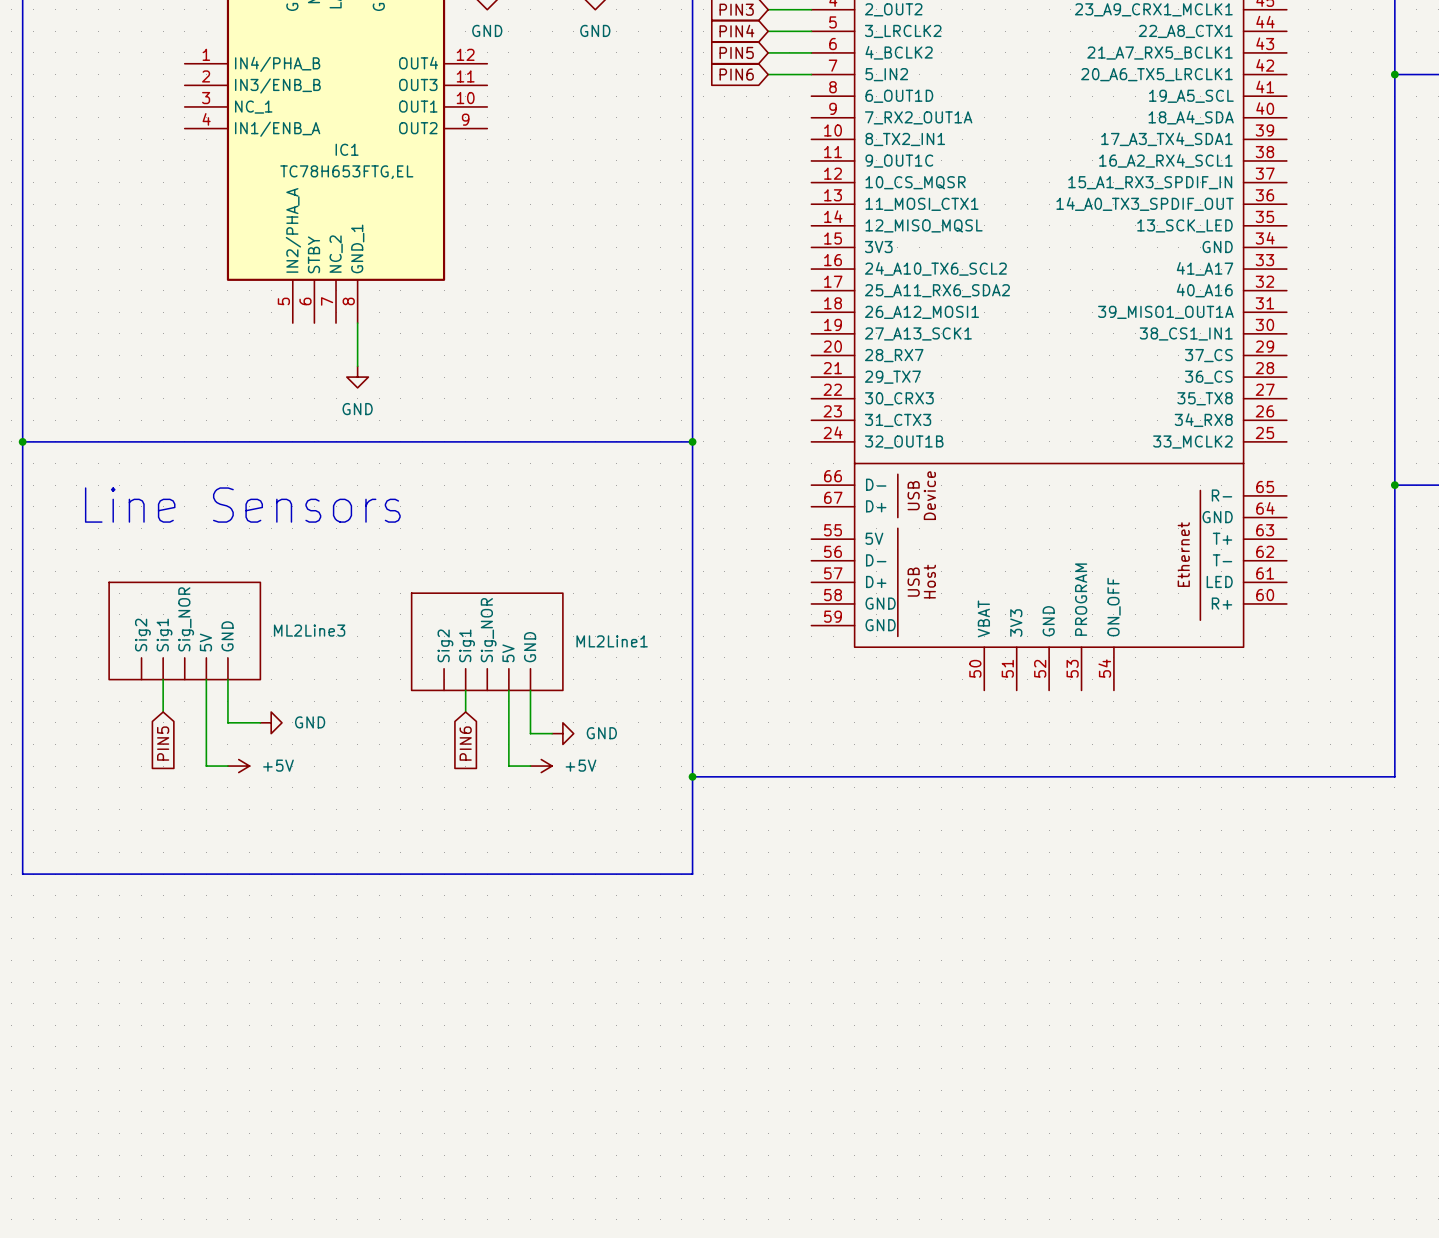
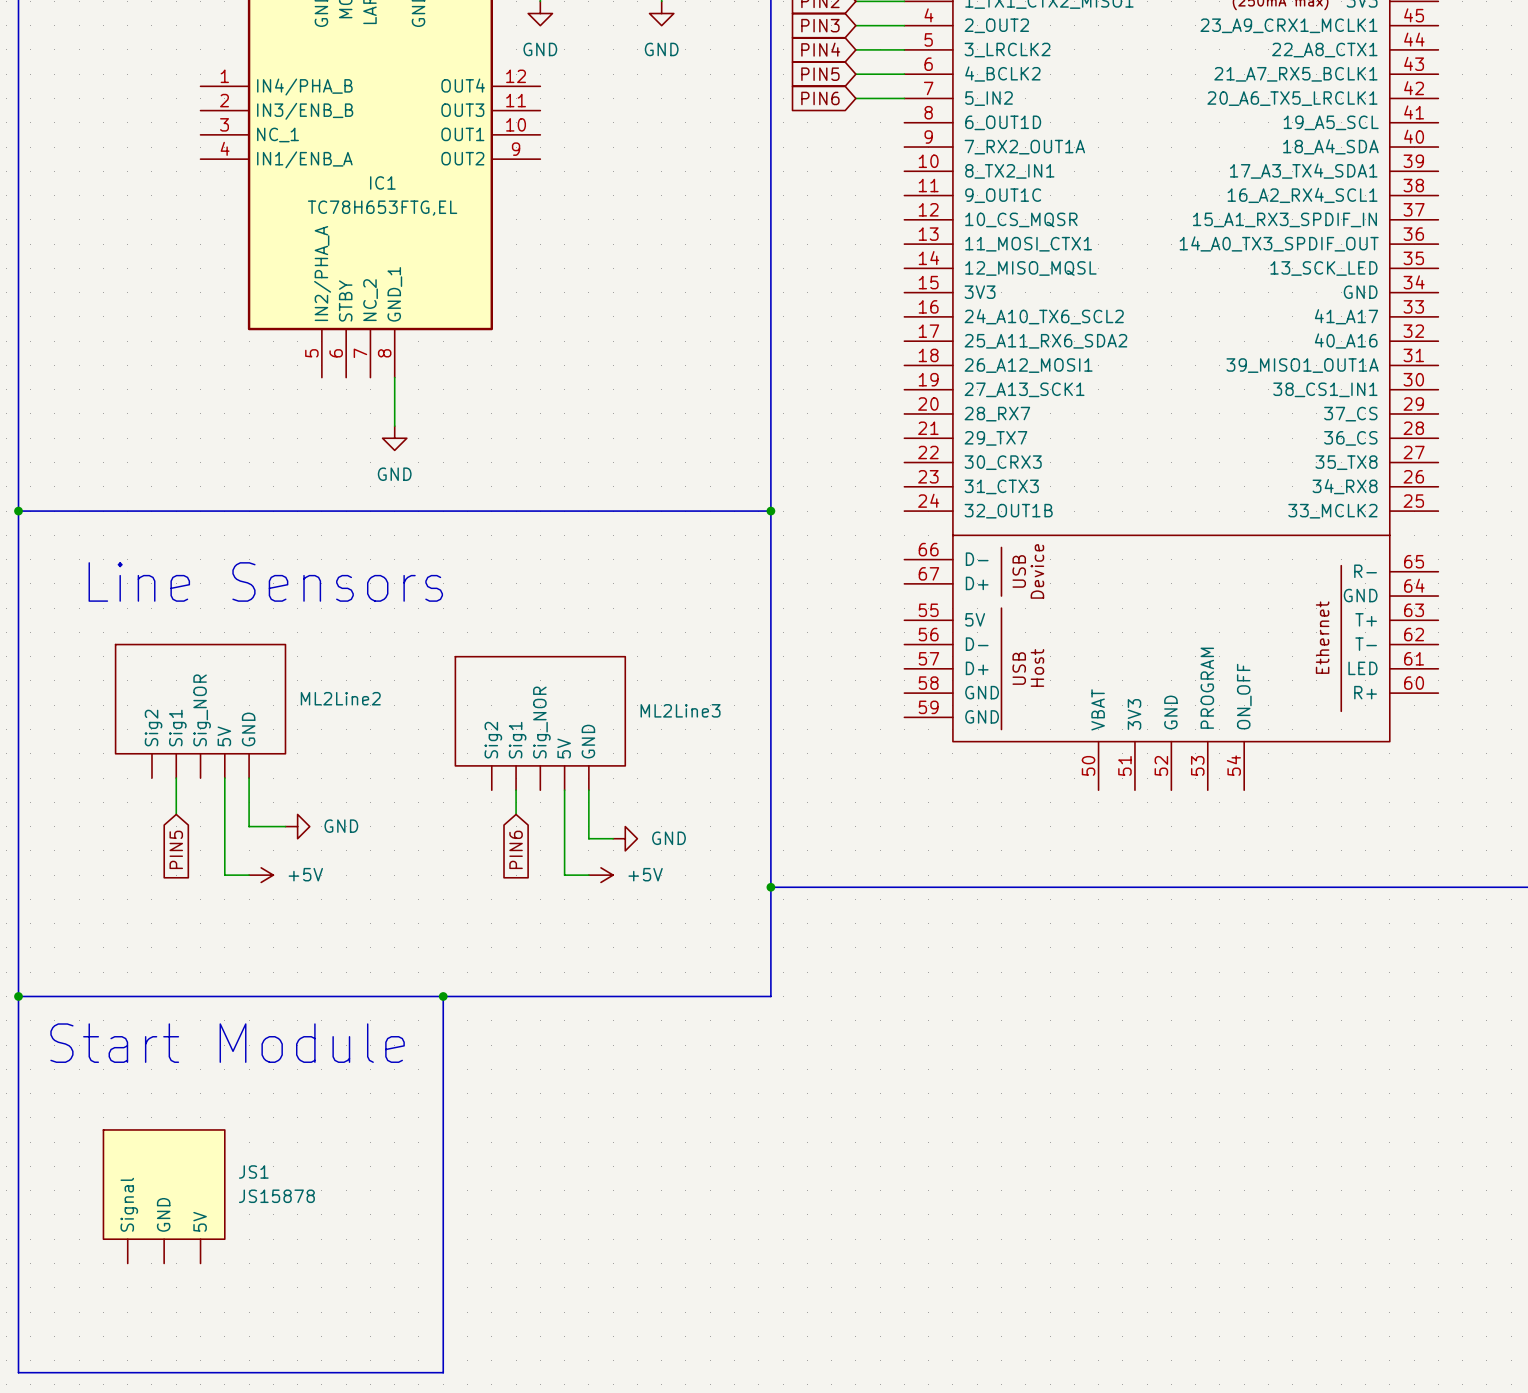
ML2Line3 symbol: [109, 582, 261, 680] -> [455, 656, 626, 791]
ML2Line2: none -> (200, 711)
ML2Line1: (487, 641) -> none
bus: none -> (18, 996) (18, 1372) (443, 1372) (443, 996)
junction: none -> (18, 996)
junction: none -> (443, 996)
text: none -> Start Module (227, 1043)
JS1: none -> JS15878 (164, 1196)

